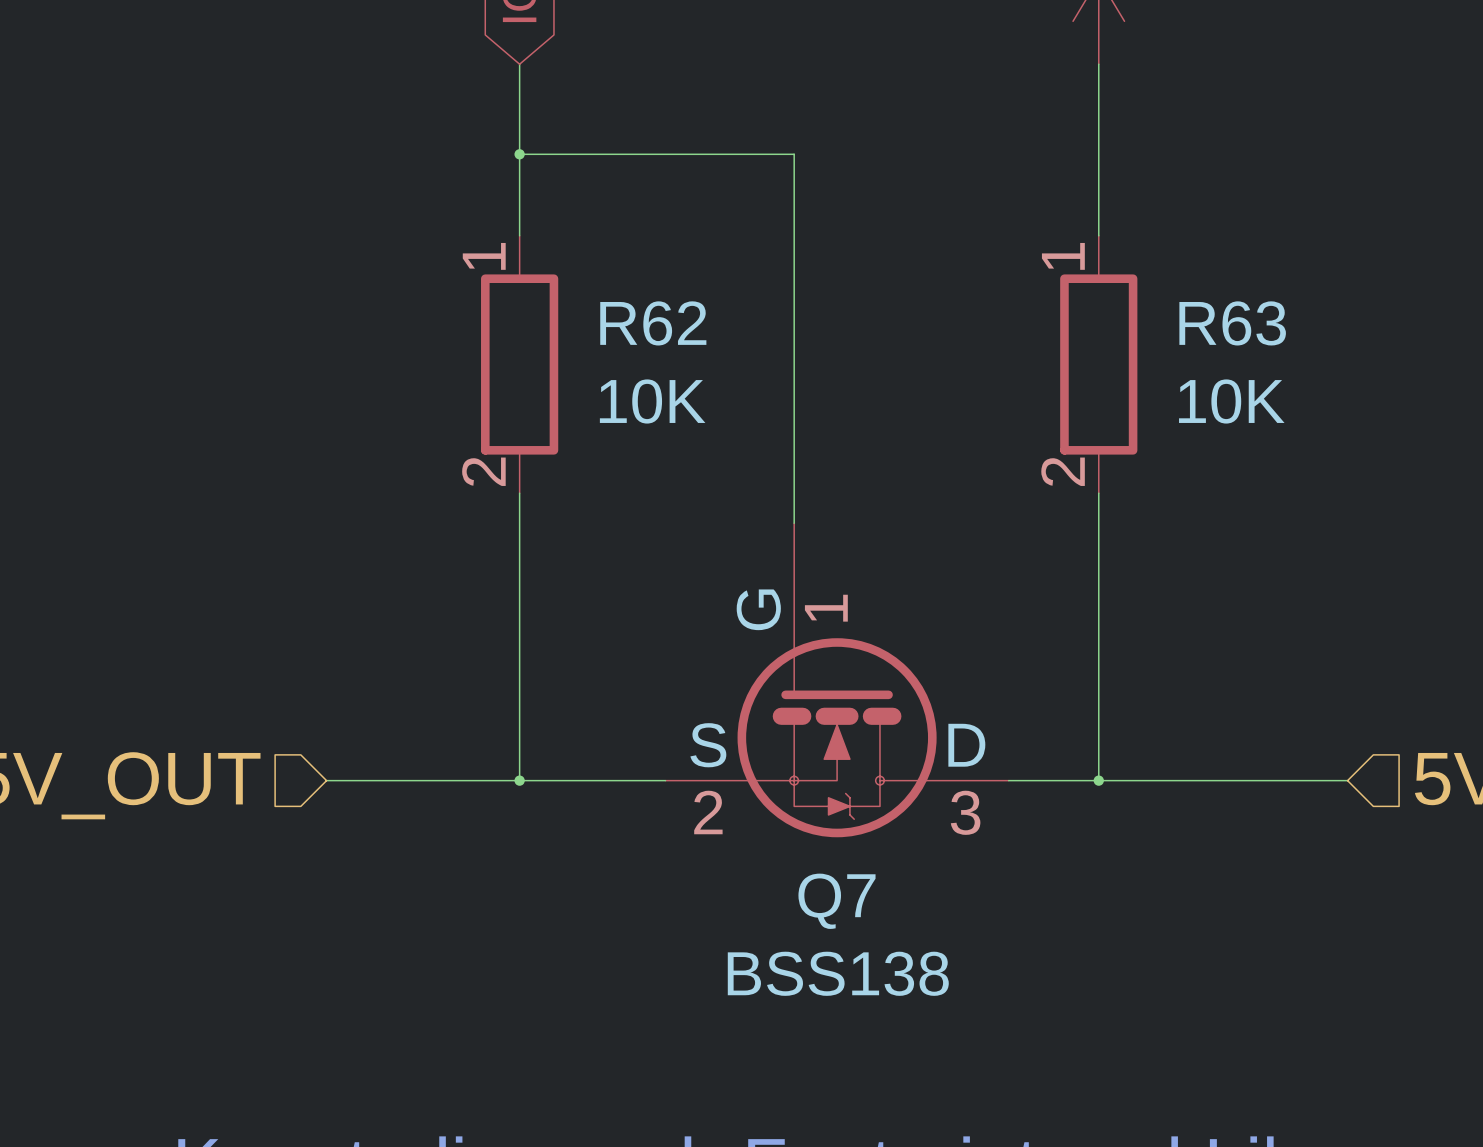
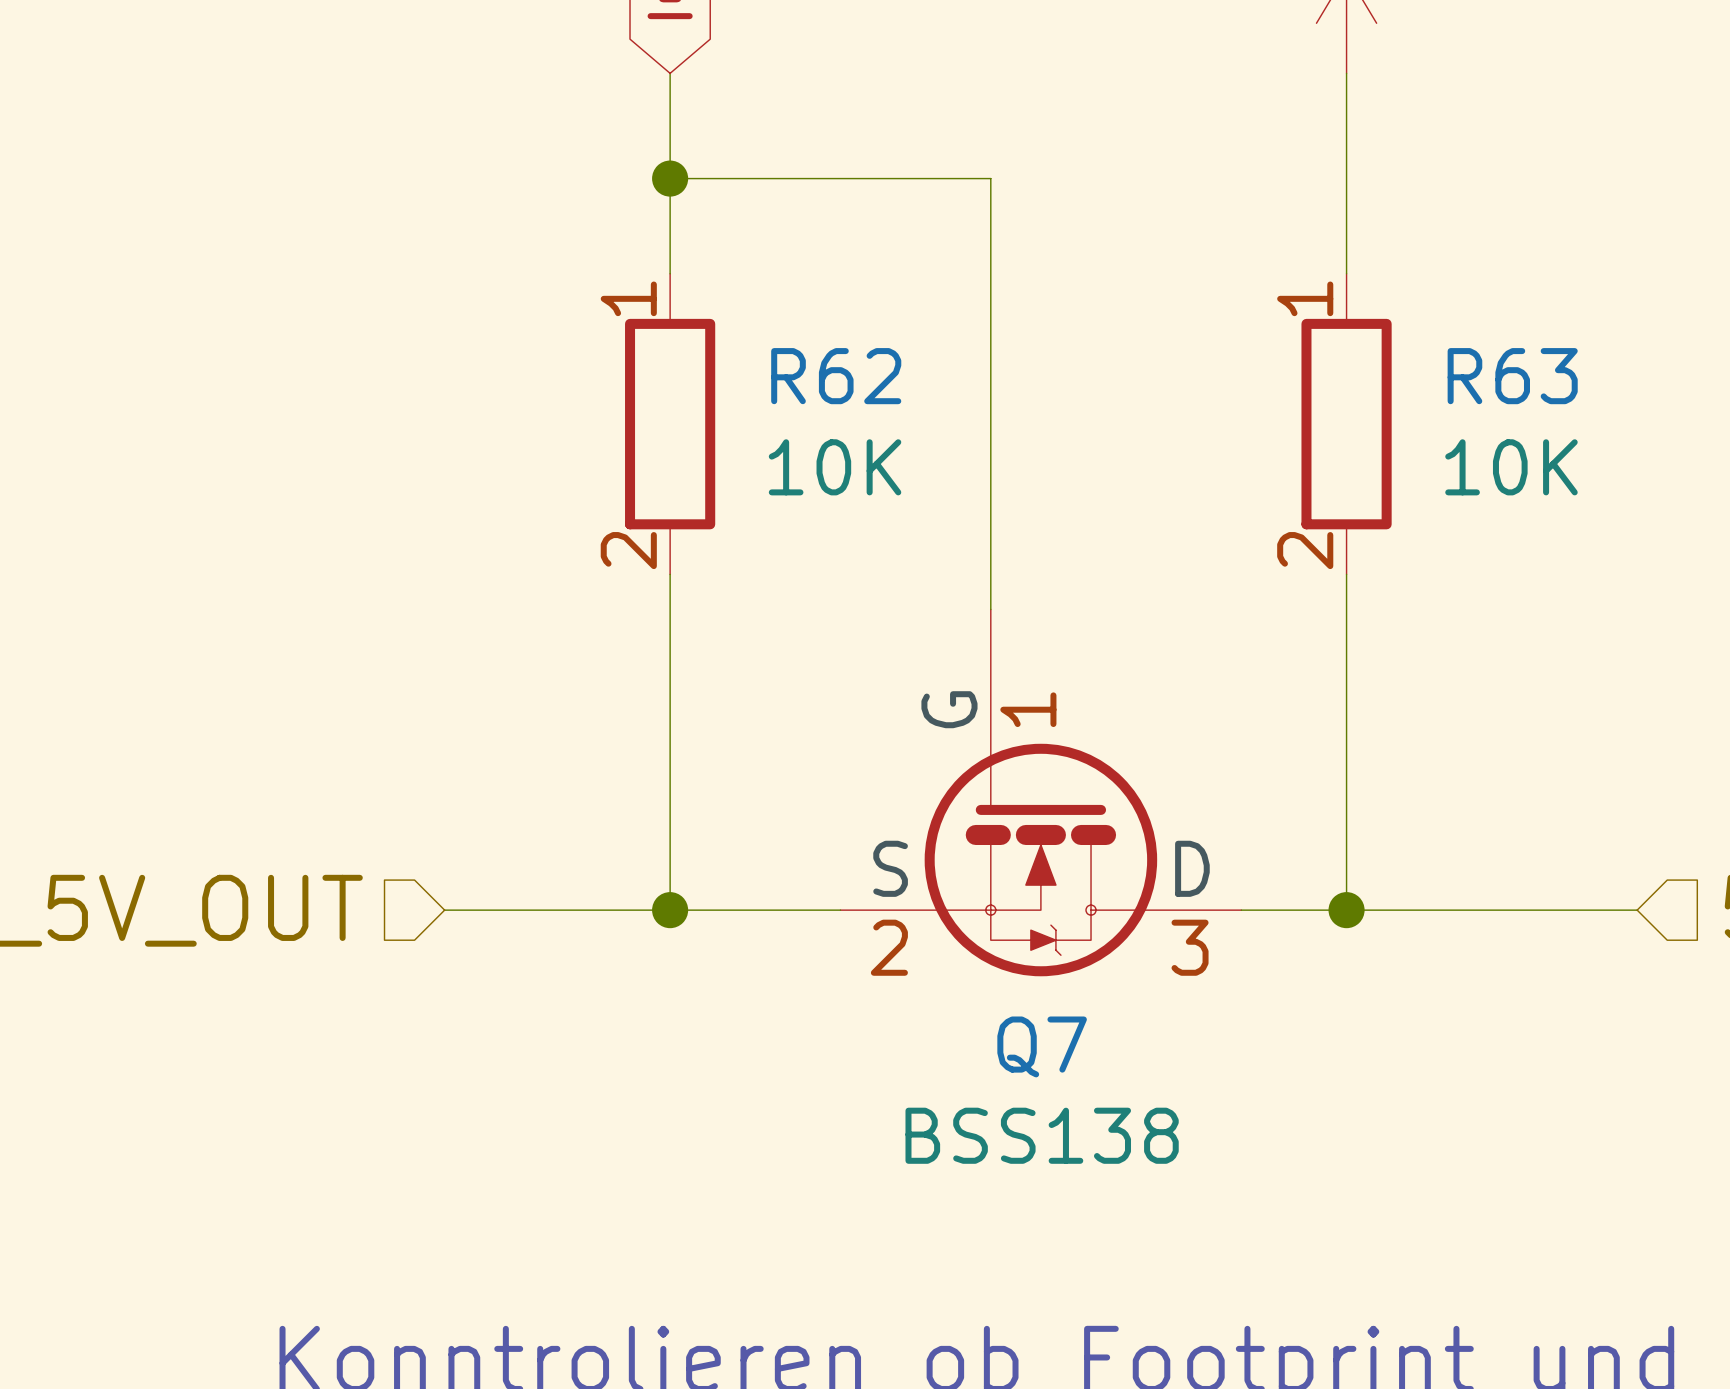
junction size: [514, 149, 525, 160] -> [652, 160, 689, 197]
junction size: [514, 775, 525, 786] -> [652, 892, 689, 929]
junction size: [1093, 775, 1104, 786] -> [1328, 892, 1365, 929]

